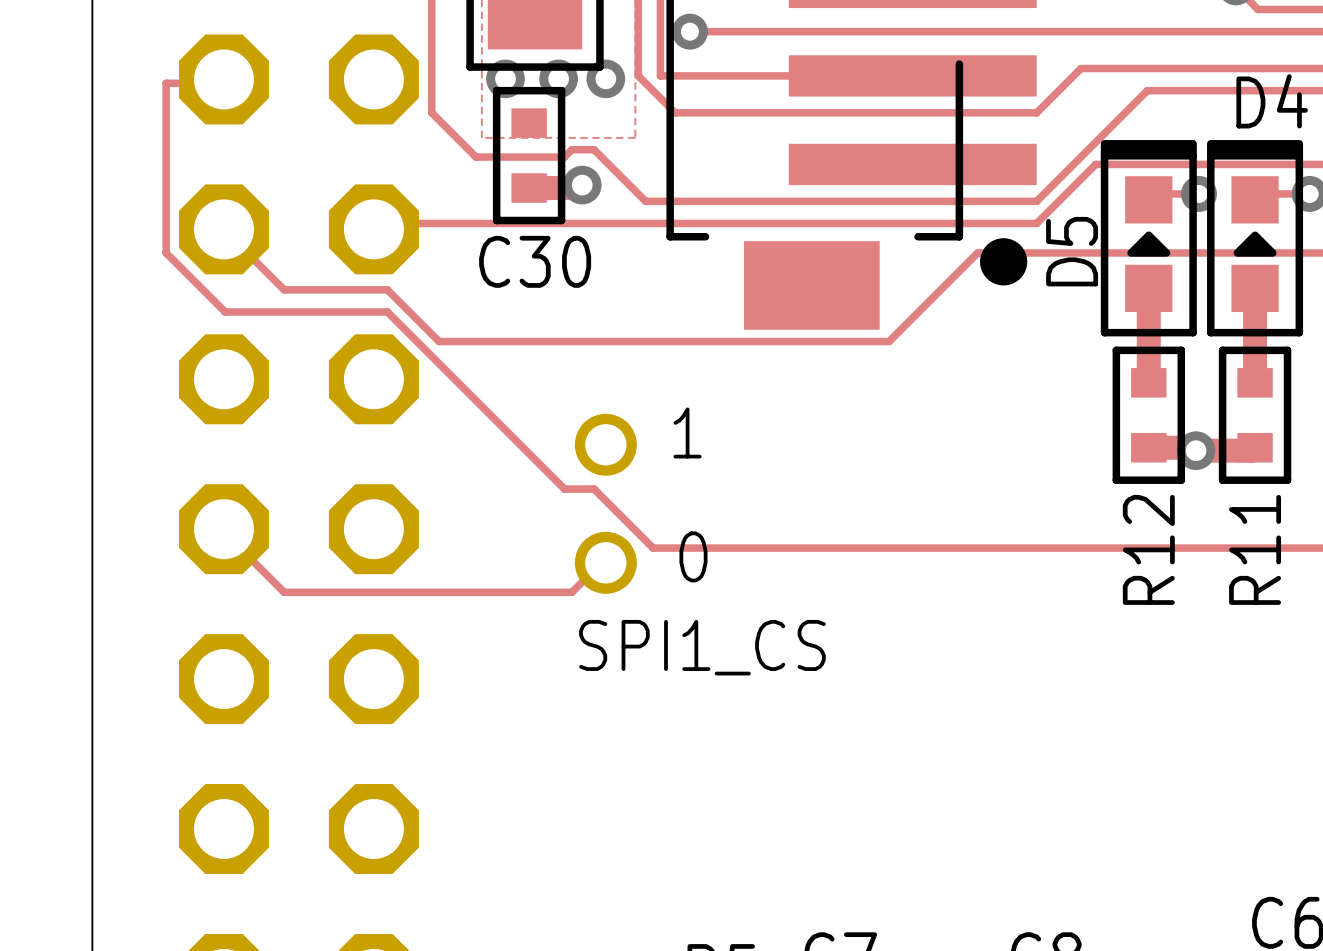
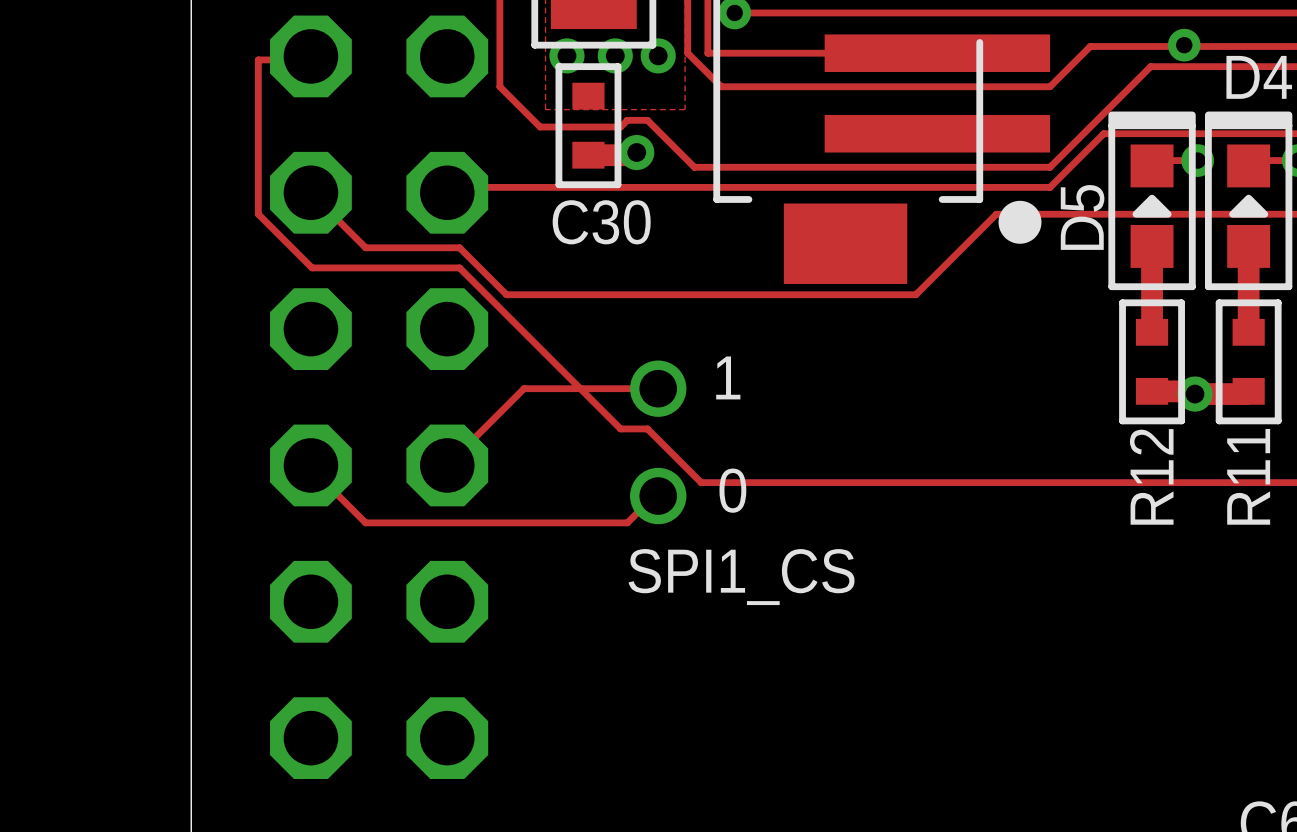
via: none -> (1184, 45)
track: none -> (658, 388) (524, 388) (447, 465)

